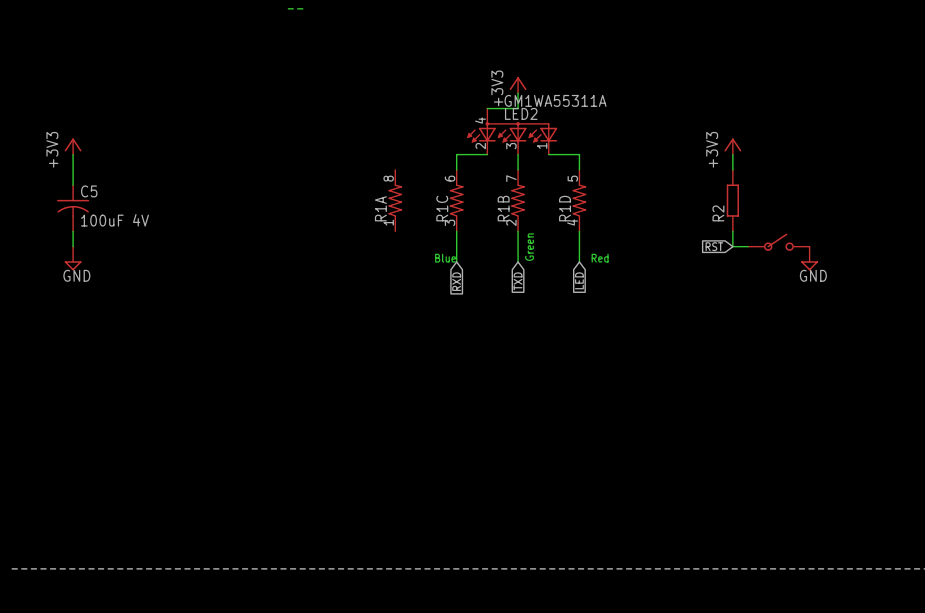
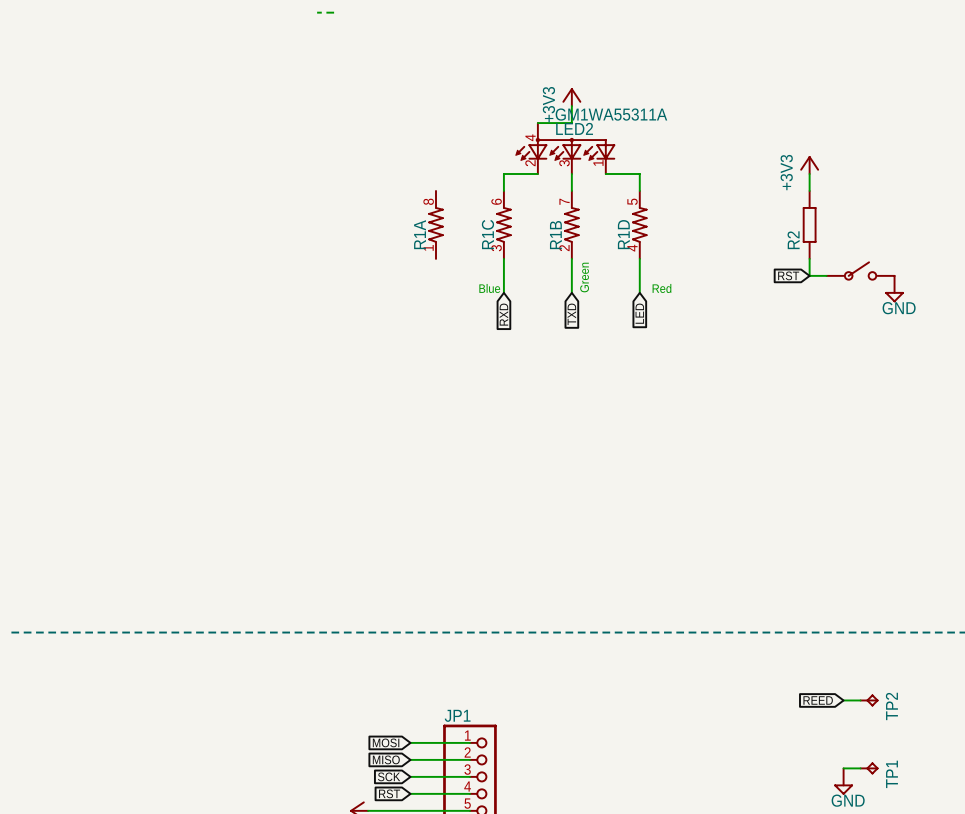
power symbol: +3V3 (73, 146) -> none
wire: (73, 154) (73, 185) -> none
C5: 100uF 4V (73, 208) -> none
wire: (73, 231) (73, 246) -> none
power symbol: GND (73, 258) -> none

